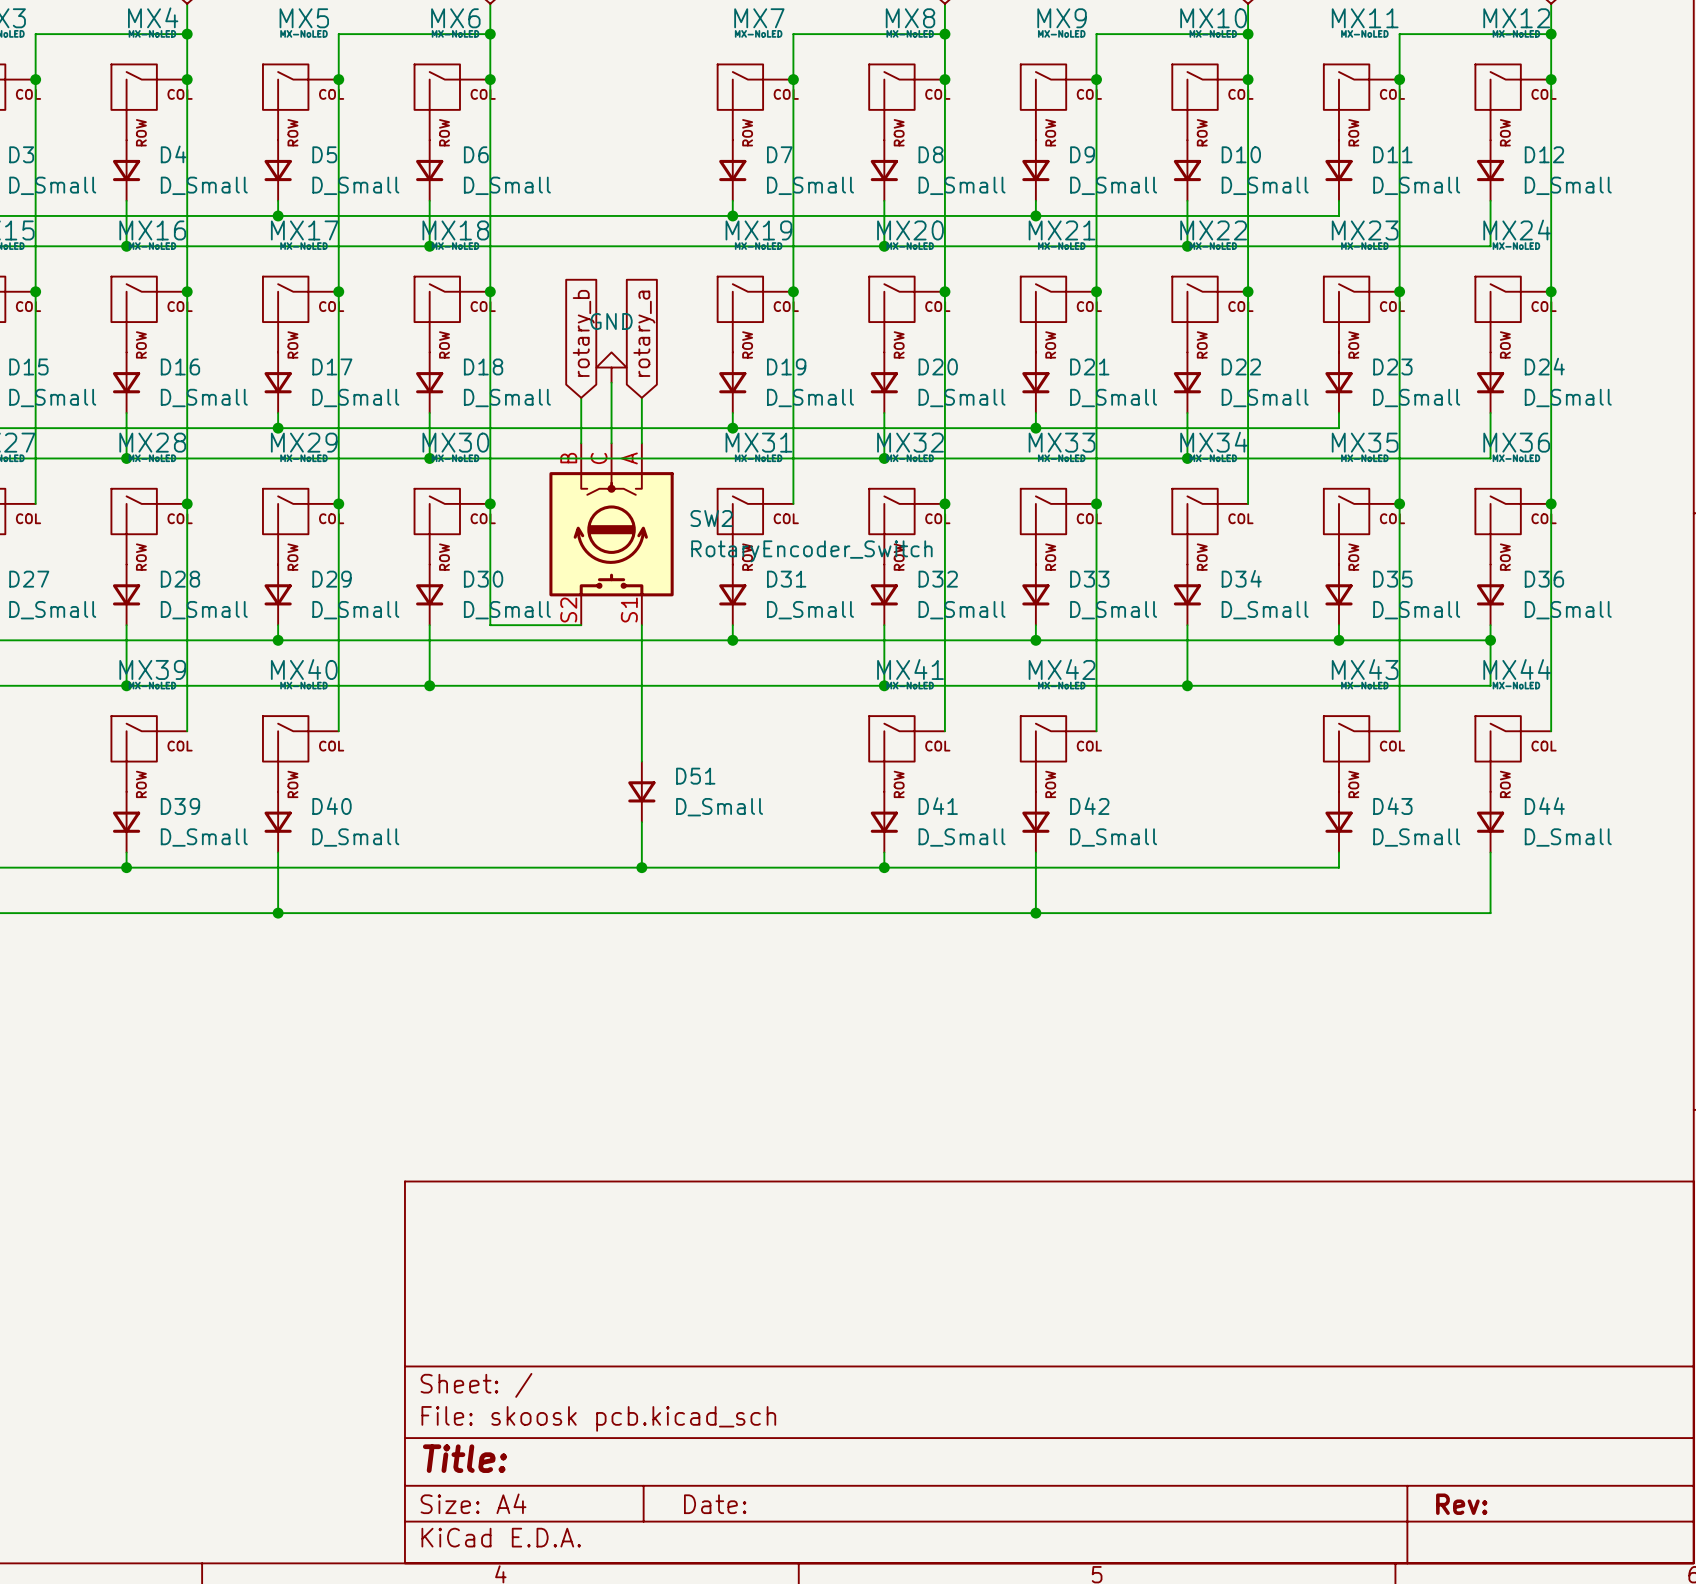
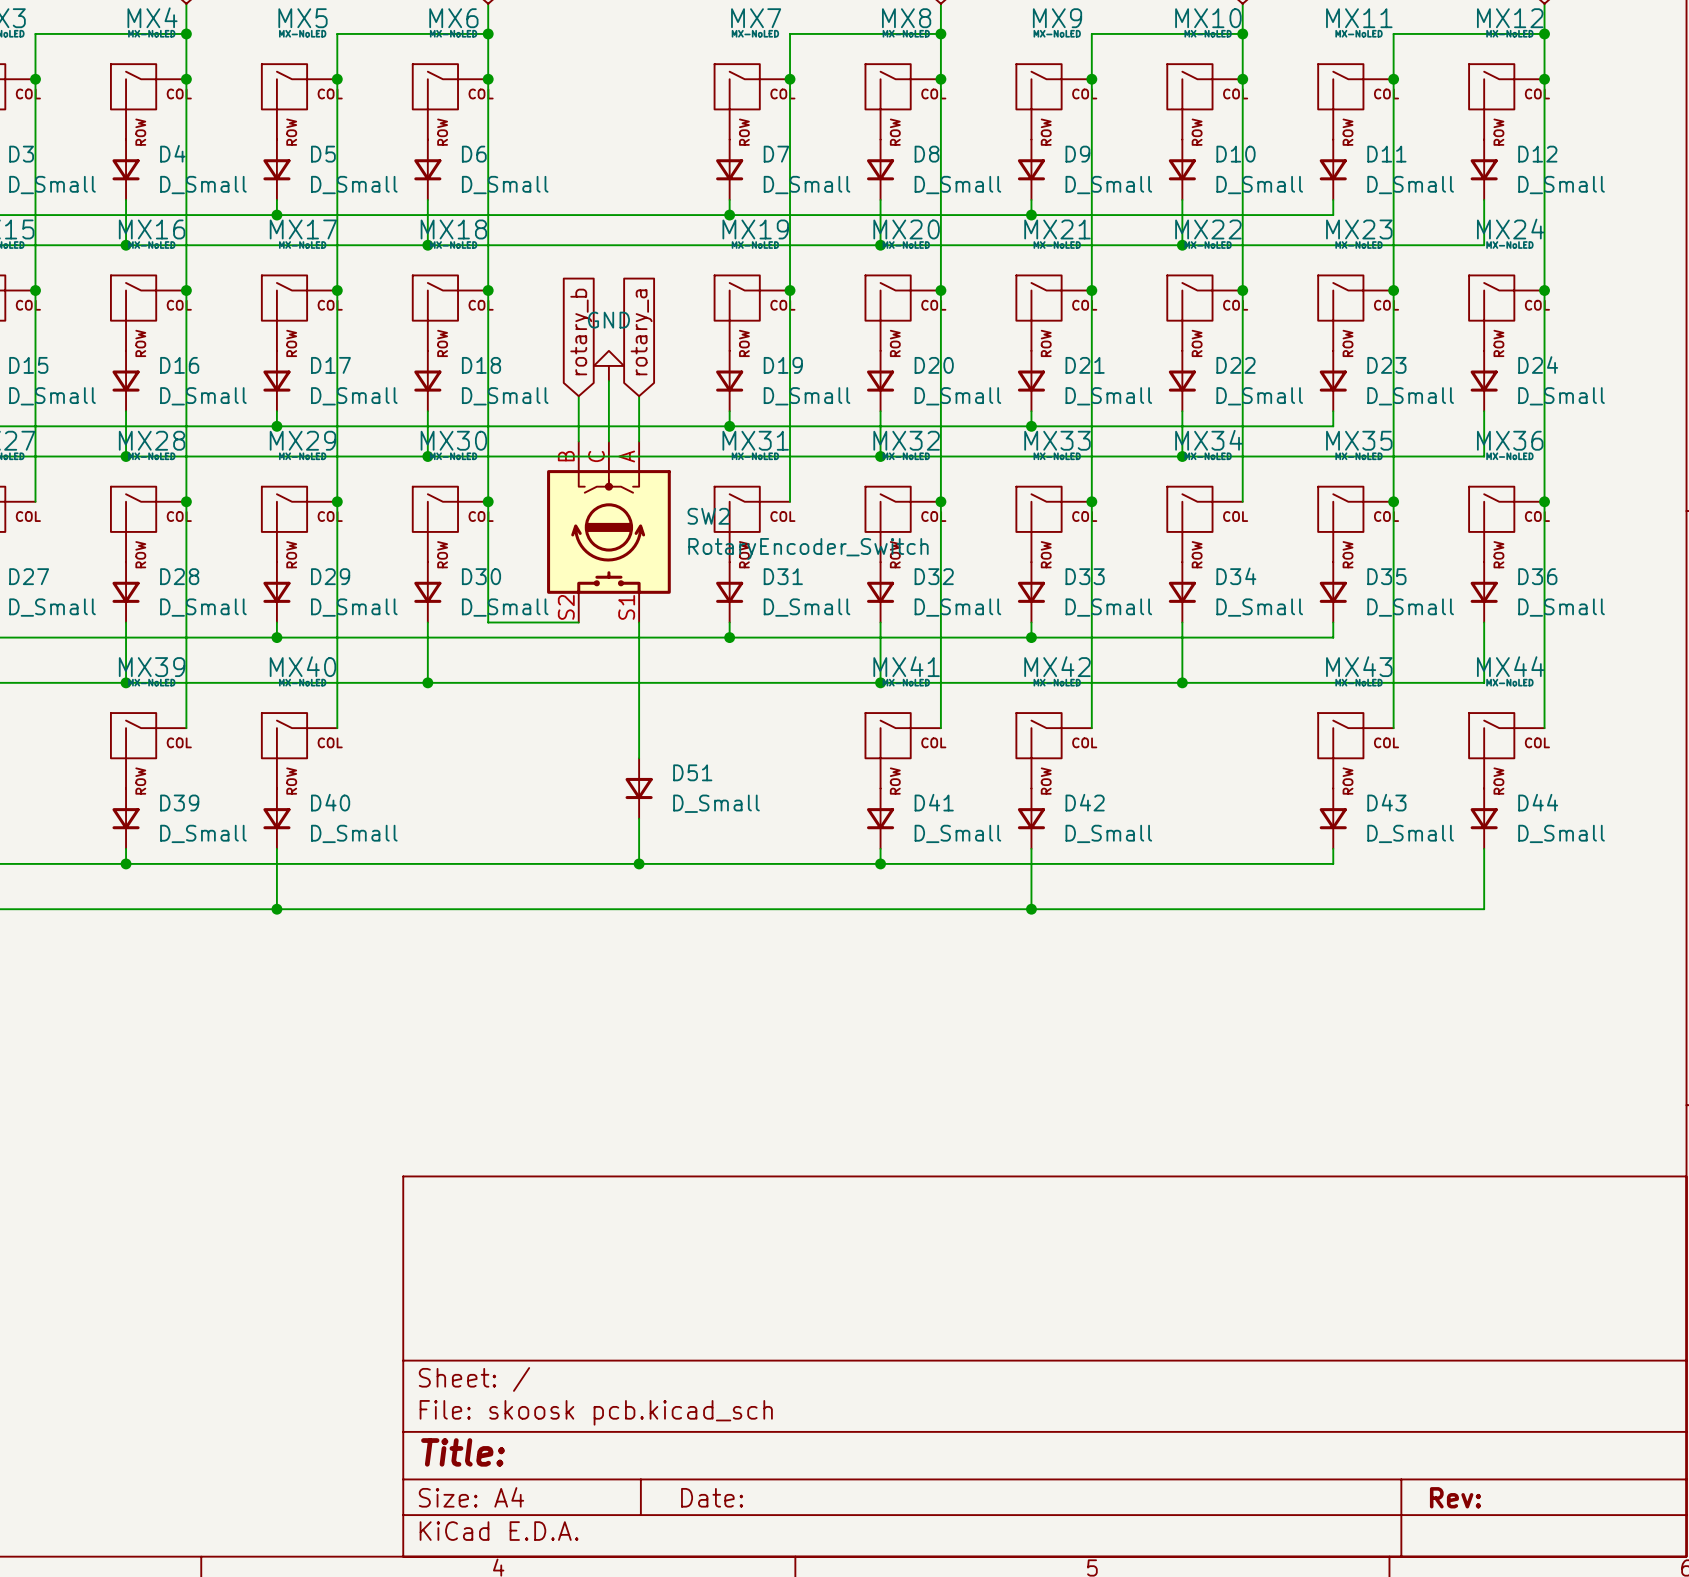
wire: (1338, 640) (1490, 640) -> none
junction: (1338, 640) -> none
junction: (1490, 640) -> none

